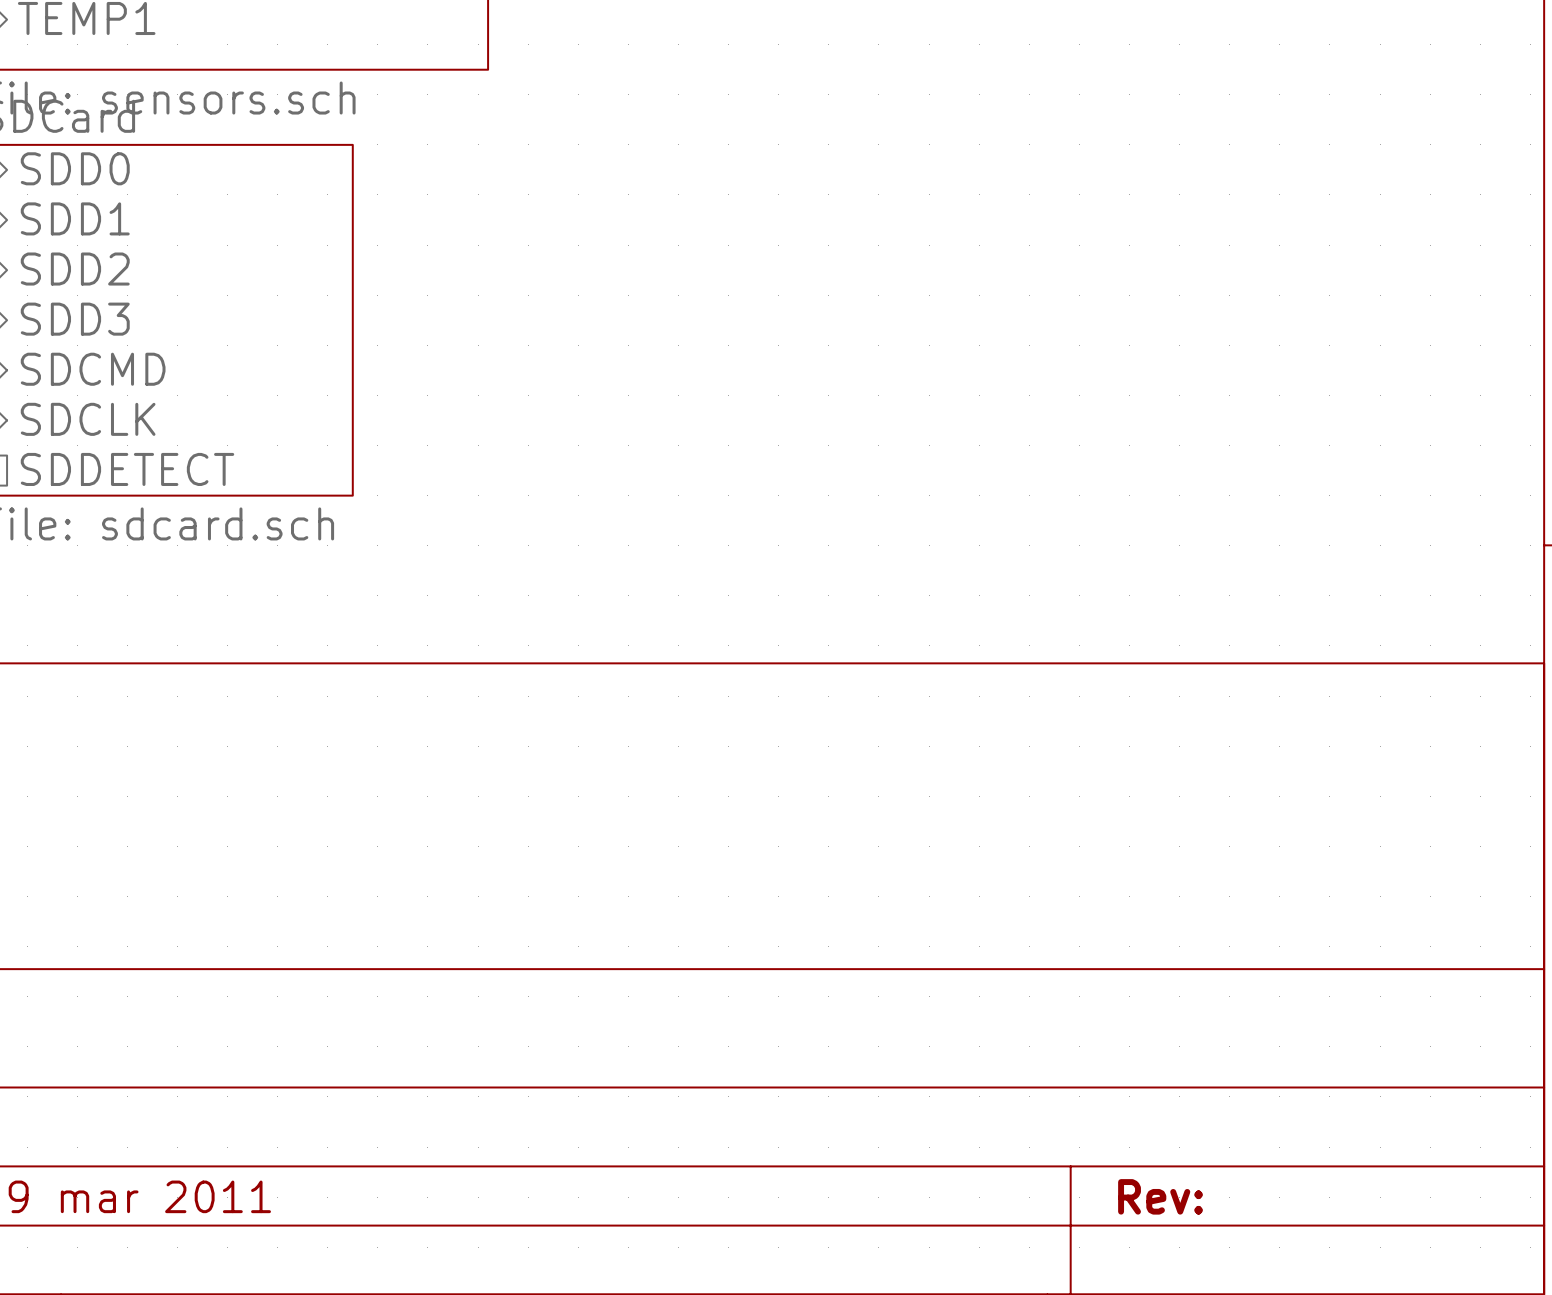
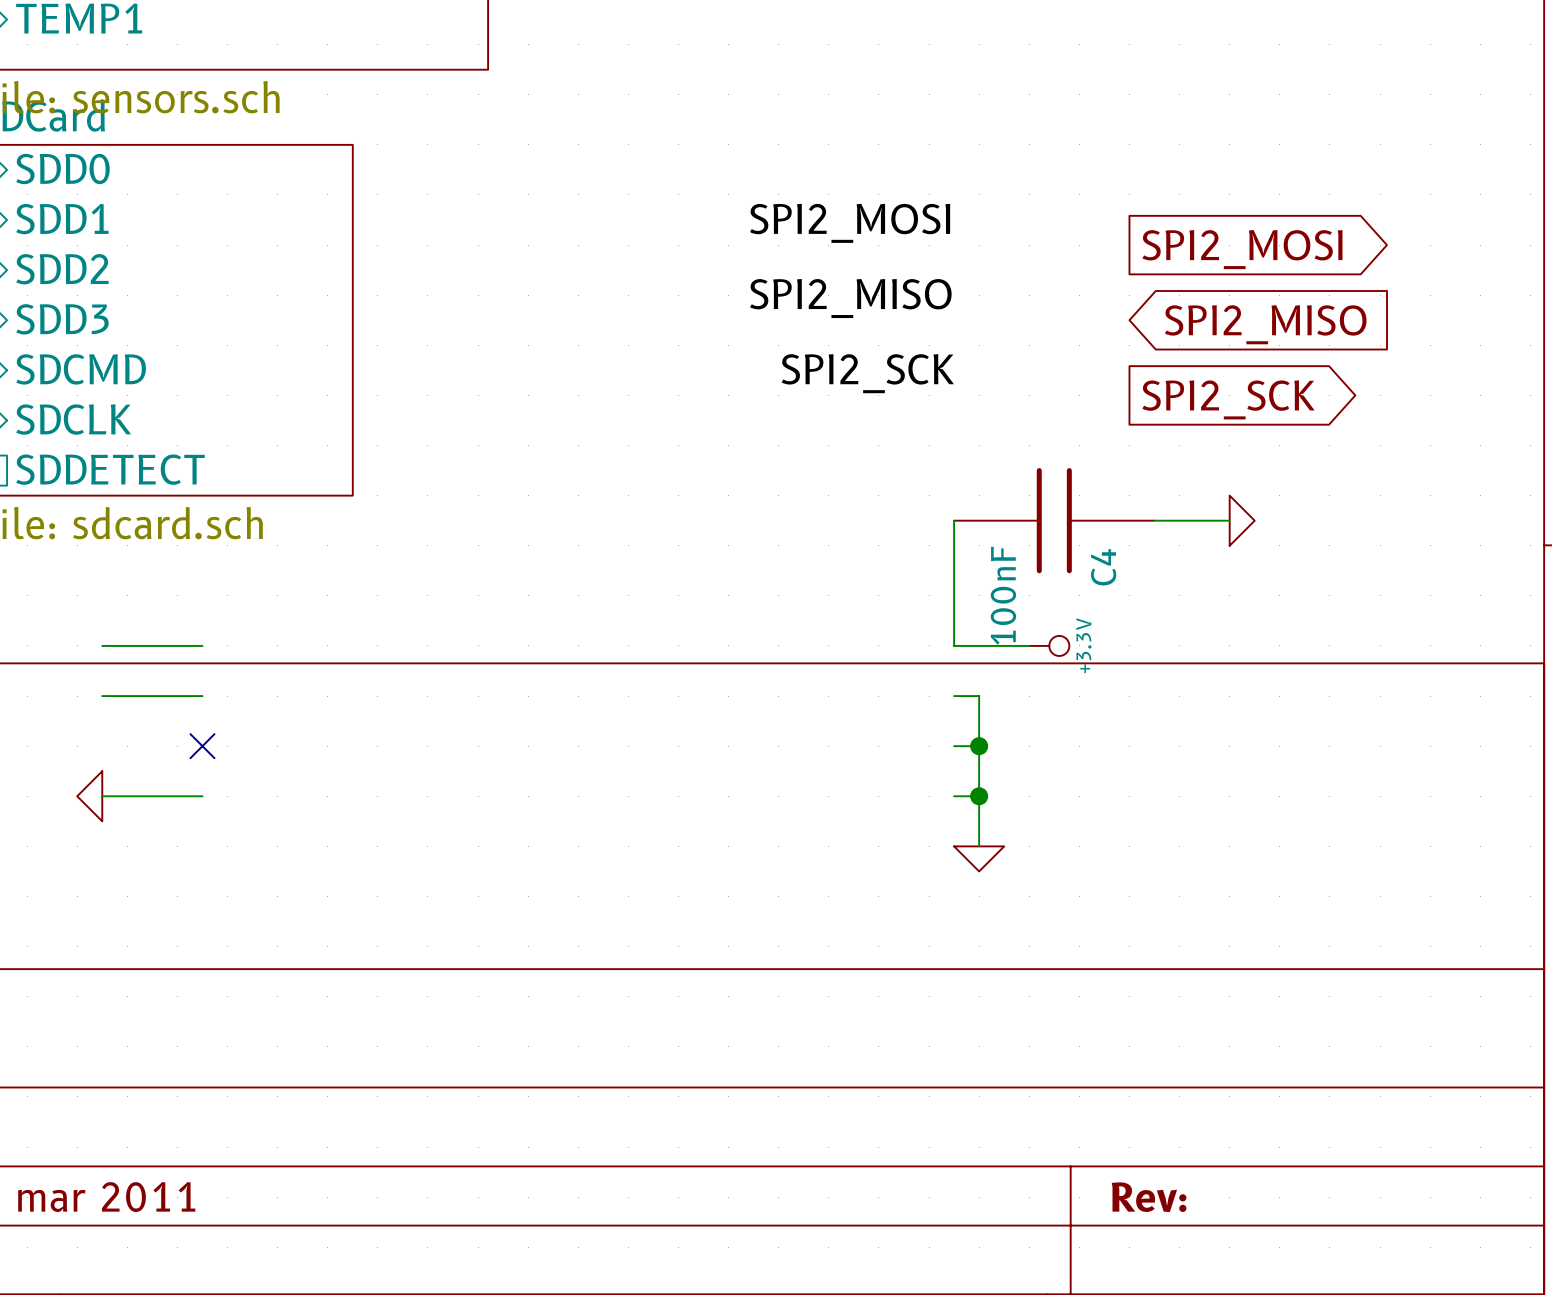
label: none -> SPI2_MOSI (850, 223)
global label: none -> SPI2_MOSI (1242, 249)
label: none -> SPI2_MISO (850, 298)
global label: none -> SPI2_MISO (1265, 324)
label: none -> SPI2_SCK (867, 373)
global label: none -> SPI2_SCK (1228, 399)
wire: none -> (954, 520) (954, 645) (1029, 645)
C4: none -> 100nF (1054, 520)
wire: none -> (1154, 520) (1229, 520)
power symbol: none -> (1242, 520)
wire: none -> (102, 645) (202, 645)
power symbol: none -> +3.3V (1049, 645)
wire: none -> (102, 696) (202, 696)
wire: none -> (954, 696) (979, 696) (979, 846)
no-connect mark: none -> (202, 746)
wire: none -> (954, 746) (979, 746)
junction: none -> (979, 746)
power symbol: none -> (89, 796)
wire: none -> (102, 796) (202, 796)
wire: none -> (954, 796) (979, 796)
junction: none -> (979, 796)
power symbol: none -> (979, 858)

